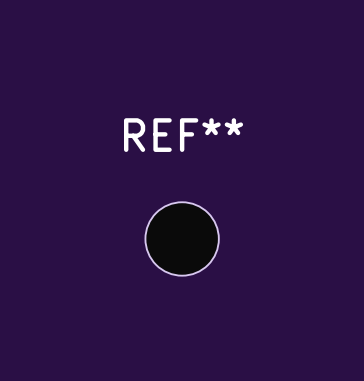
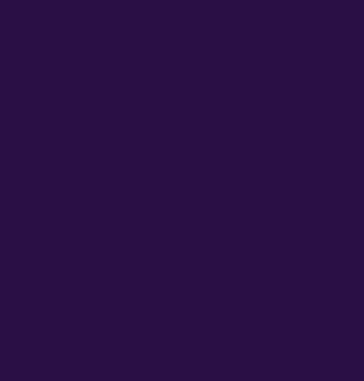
REF**: (182, 238) -> none

